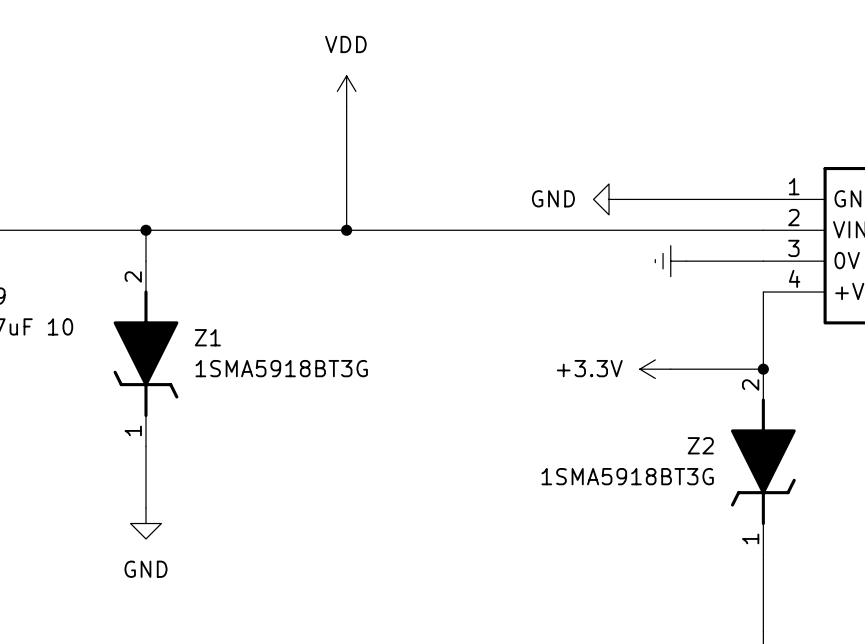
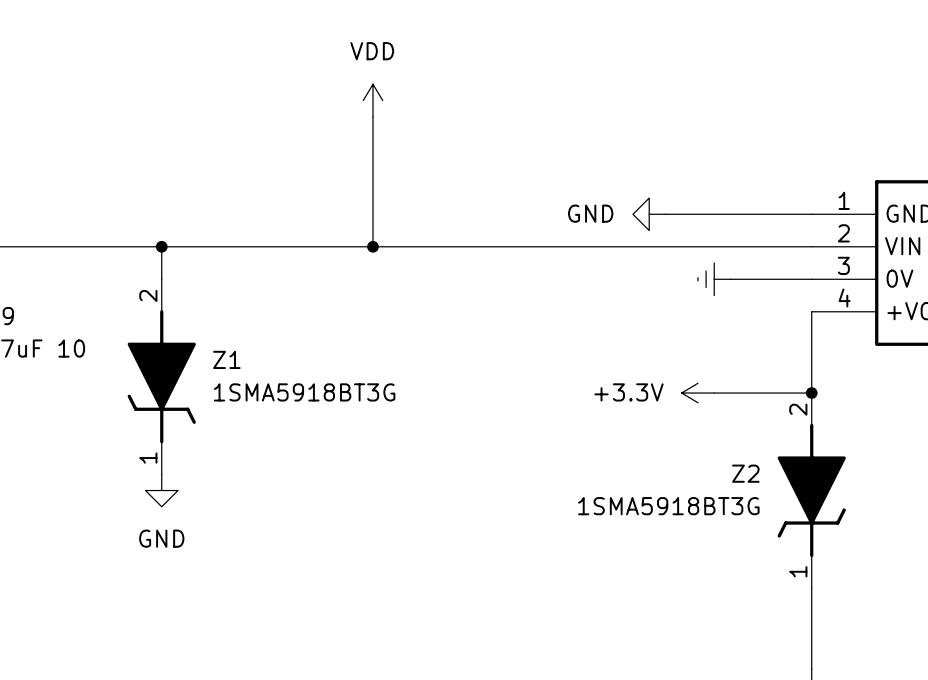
wire: (145, 446) (145, 508) -> none
power symbol position: GND (145, 523) -> GND (161, 490)

